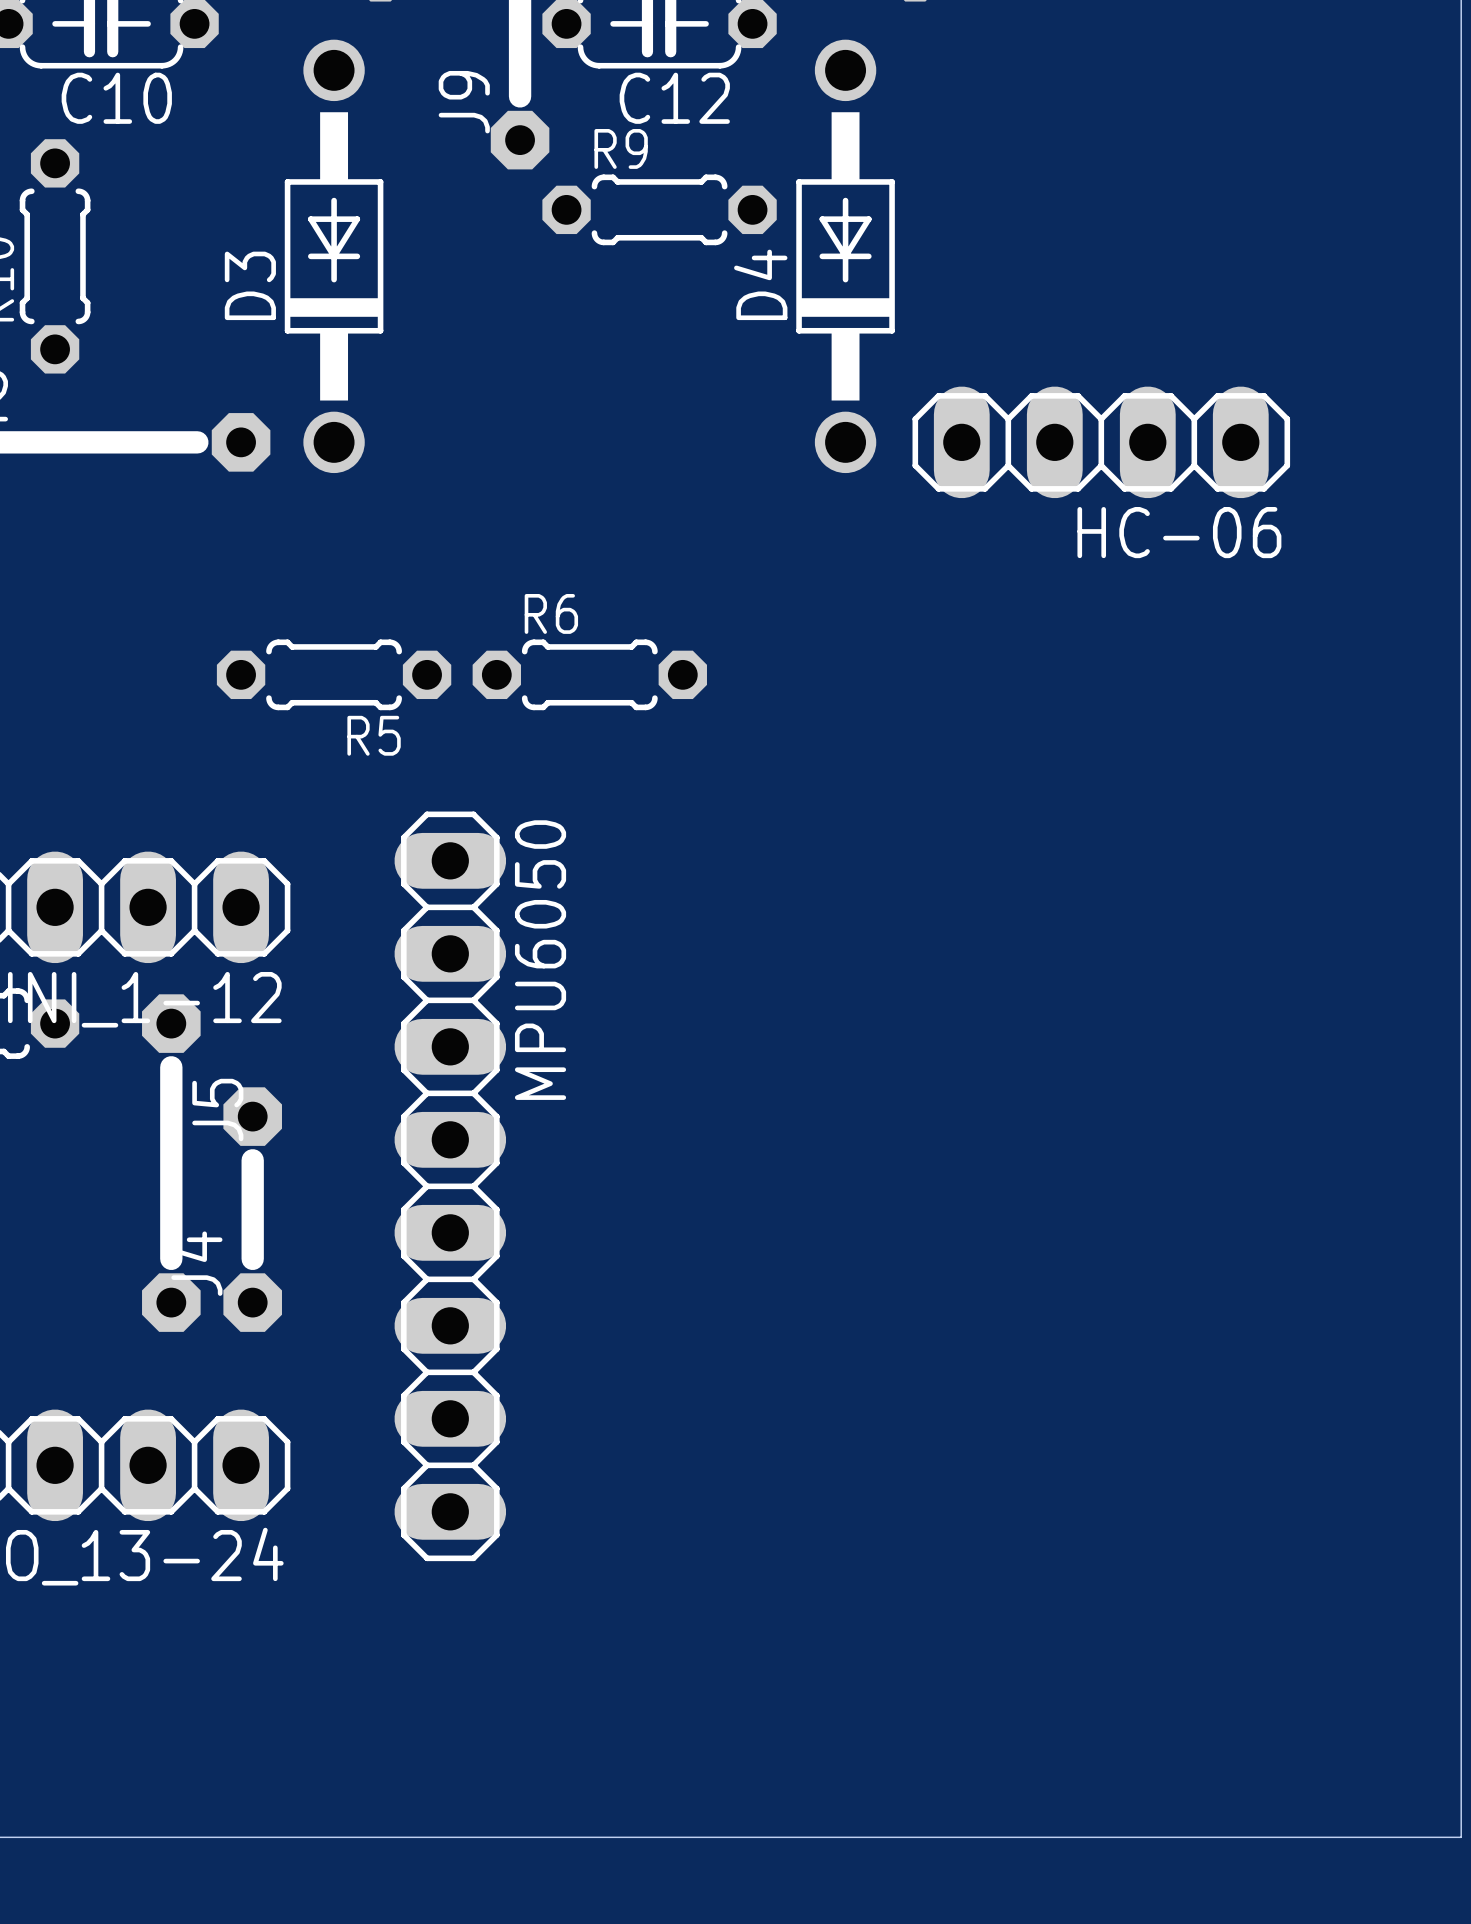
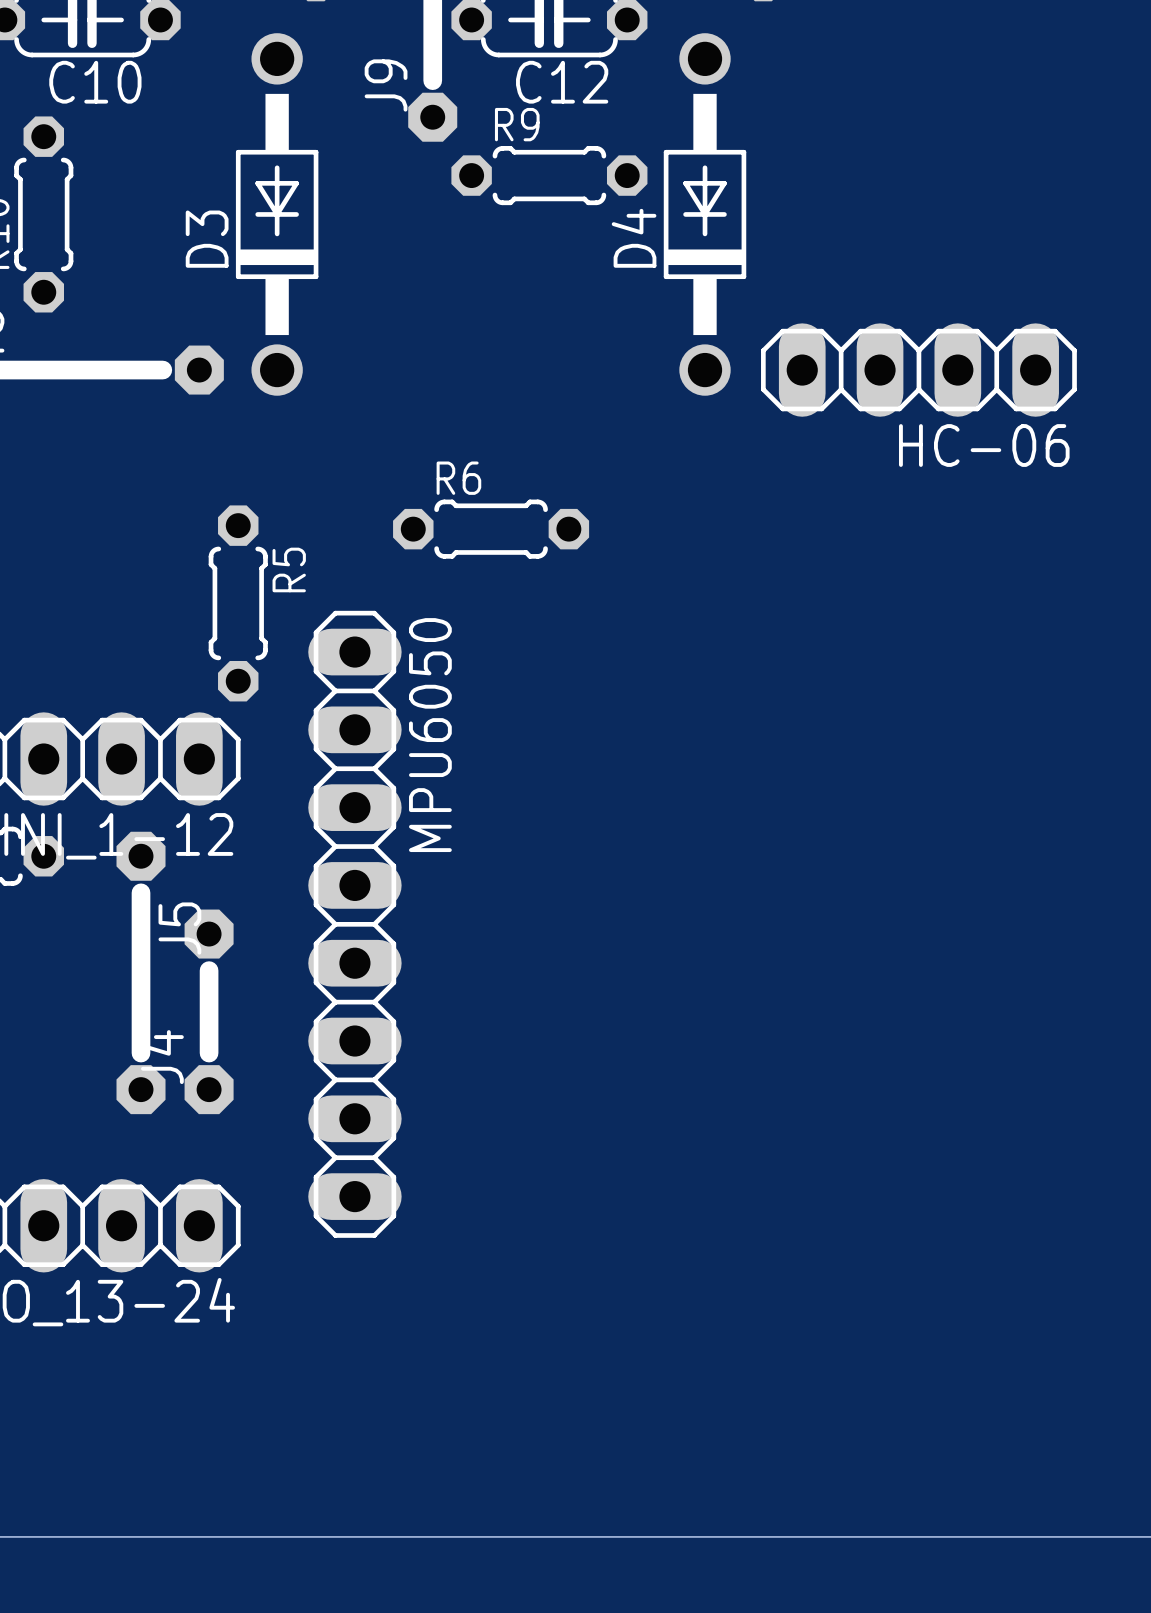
R5 rotation: 0° (334, 674) -> 90° clockwise (238, 603)
R6 position: (589, 674) -> (491, 529)
R5 name position: R5 (374, 735) -> R5 (289, 569)
MPU6050 position: (450, 1186) -> (354, 924)

